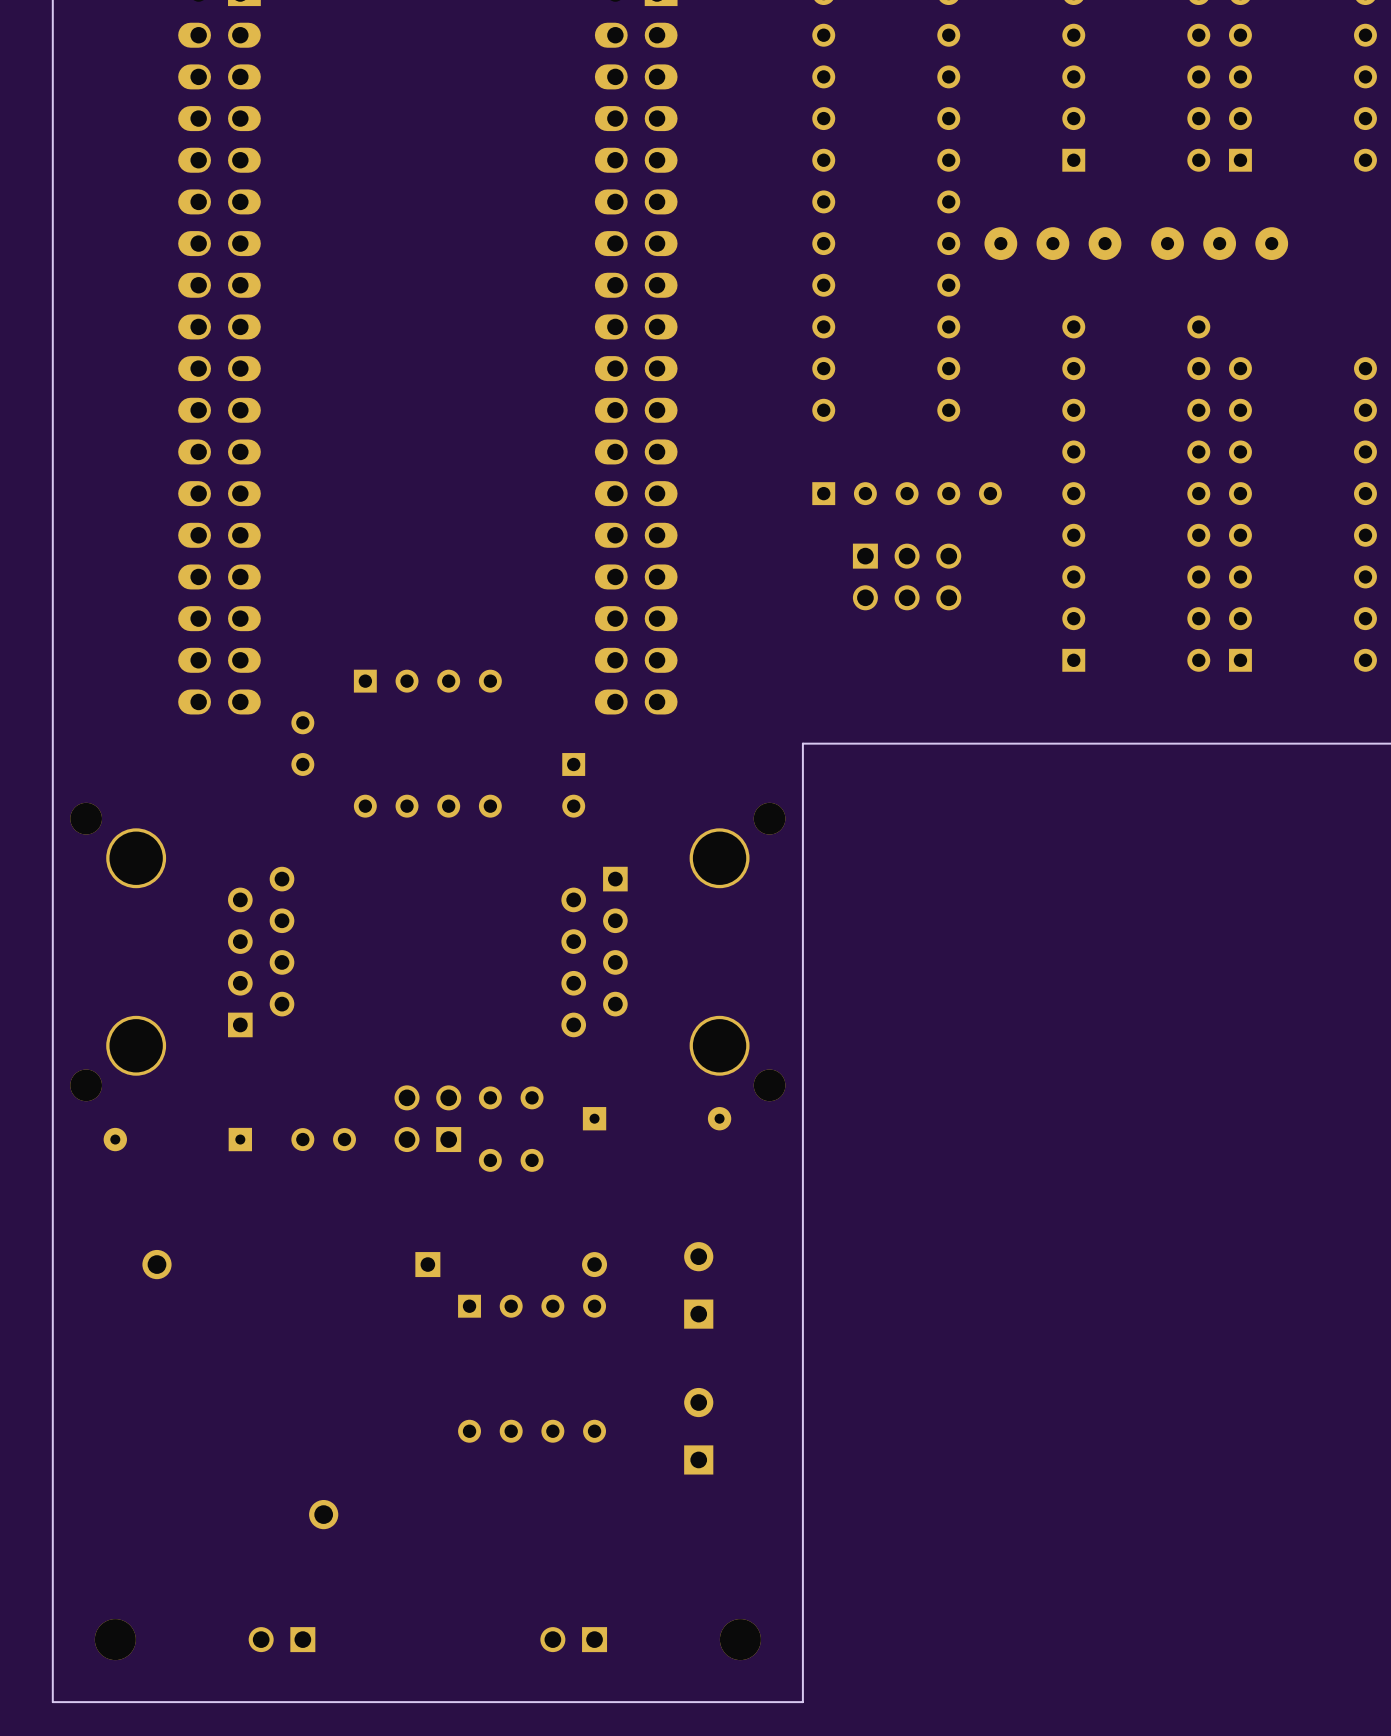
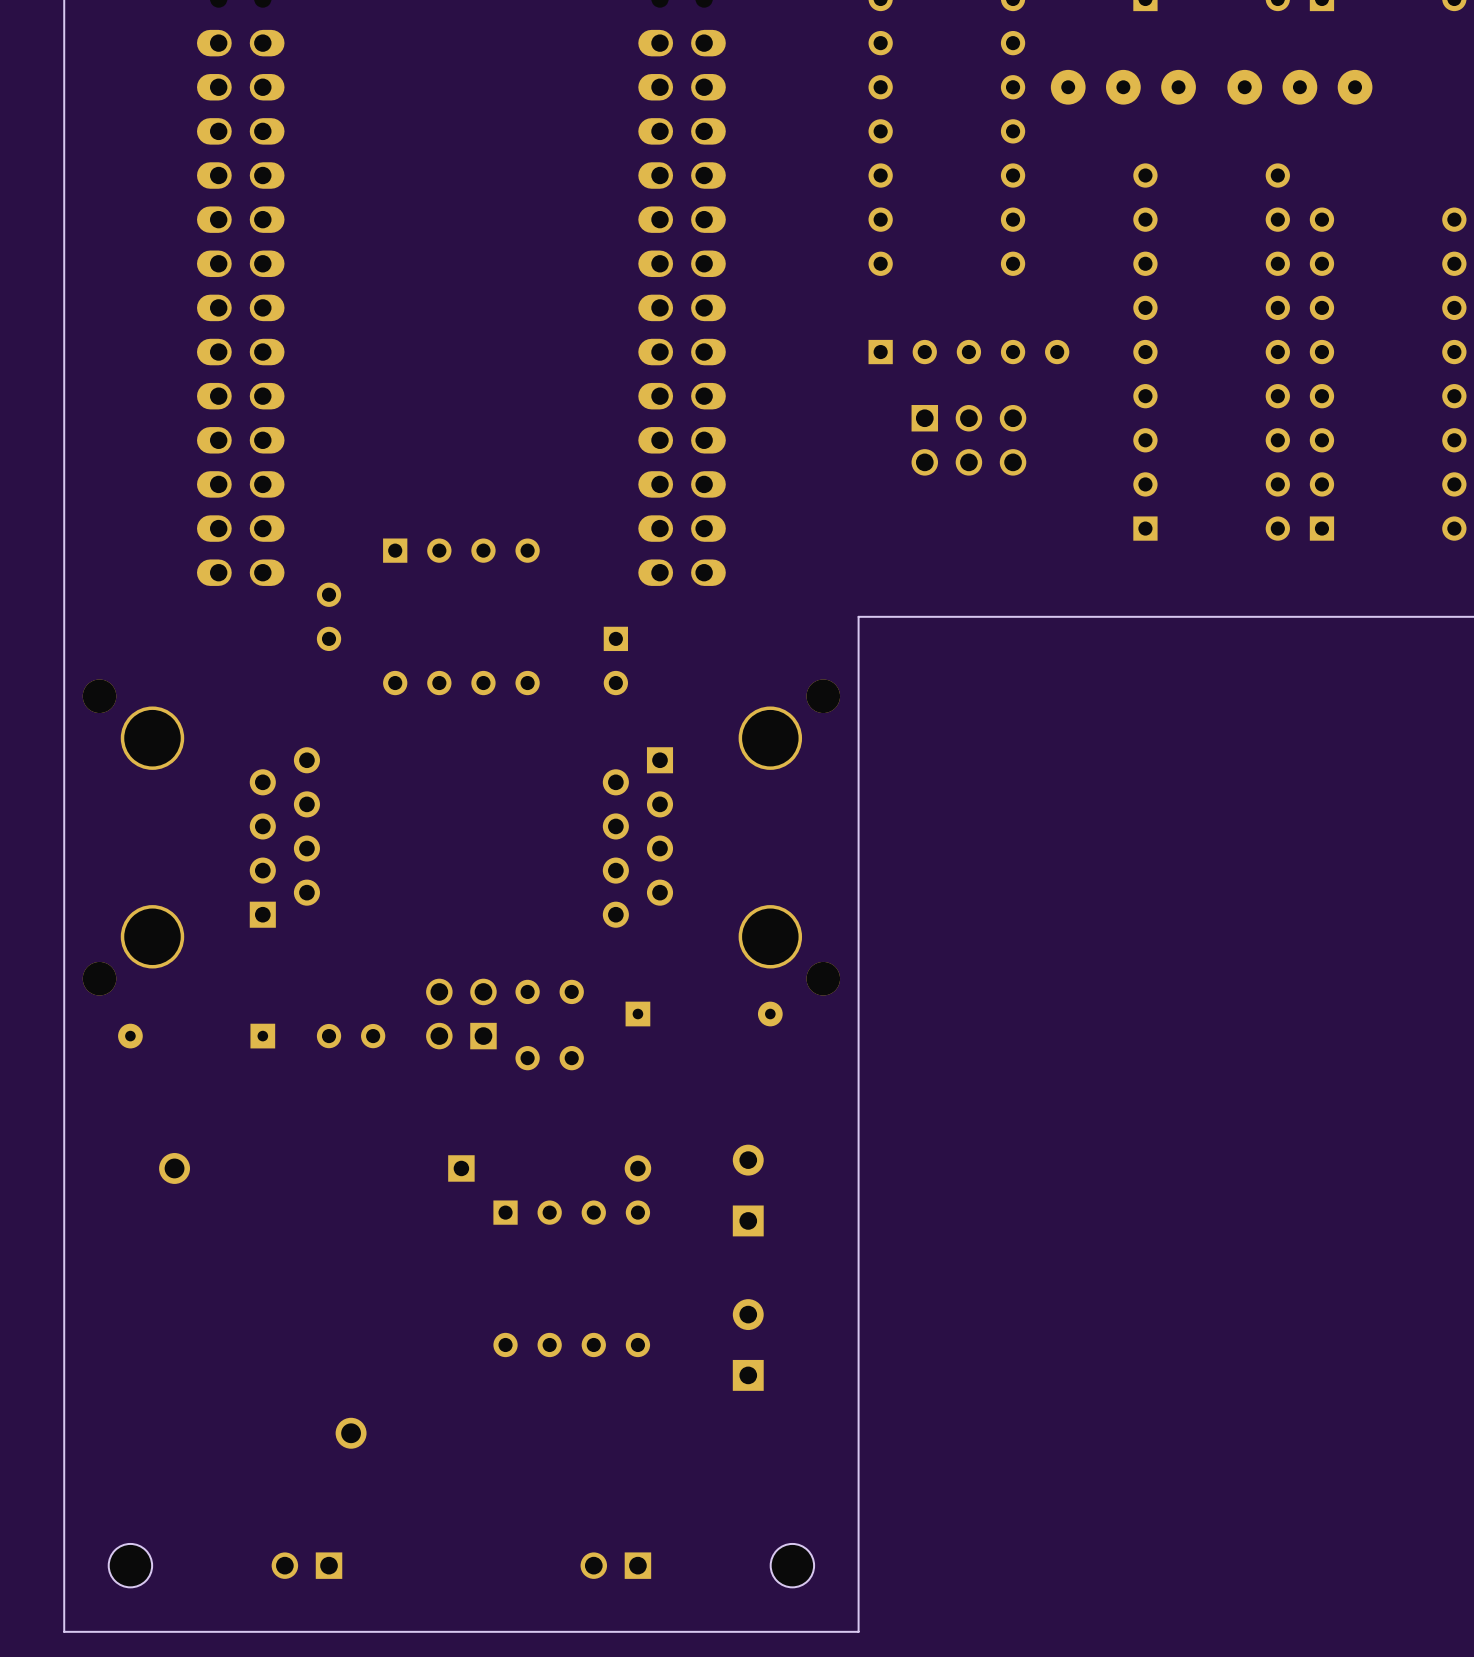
part footprint: [94, 1619, 136, 1661] -> [108, 1543, 153, 1588]
part footprint: [719, 1619, 761, 1661] -> [770, 1543, 815, 1588]

